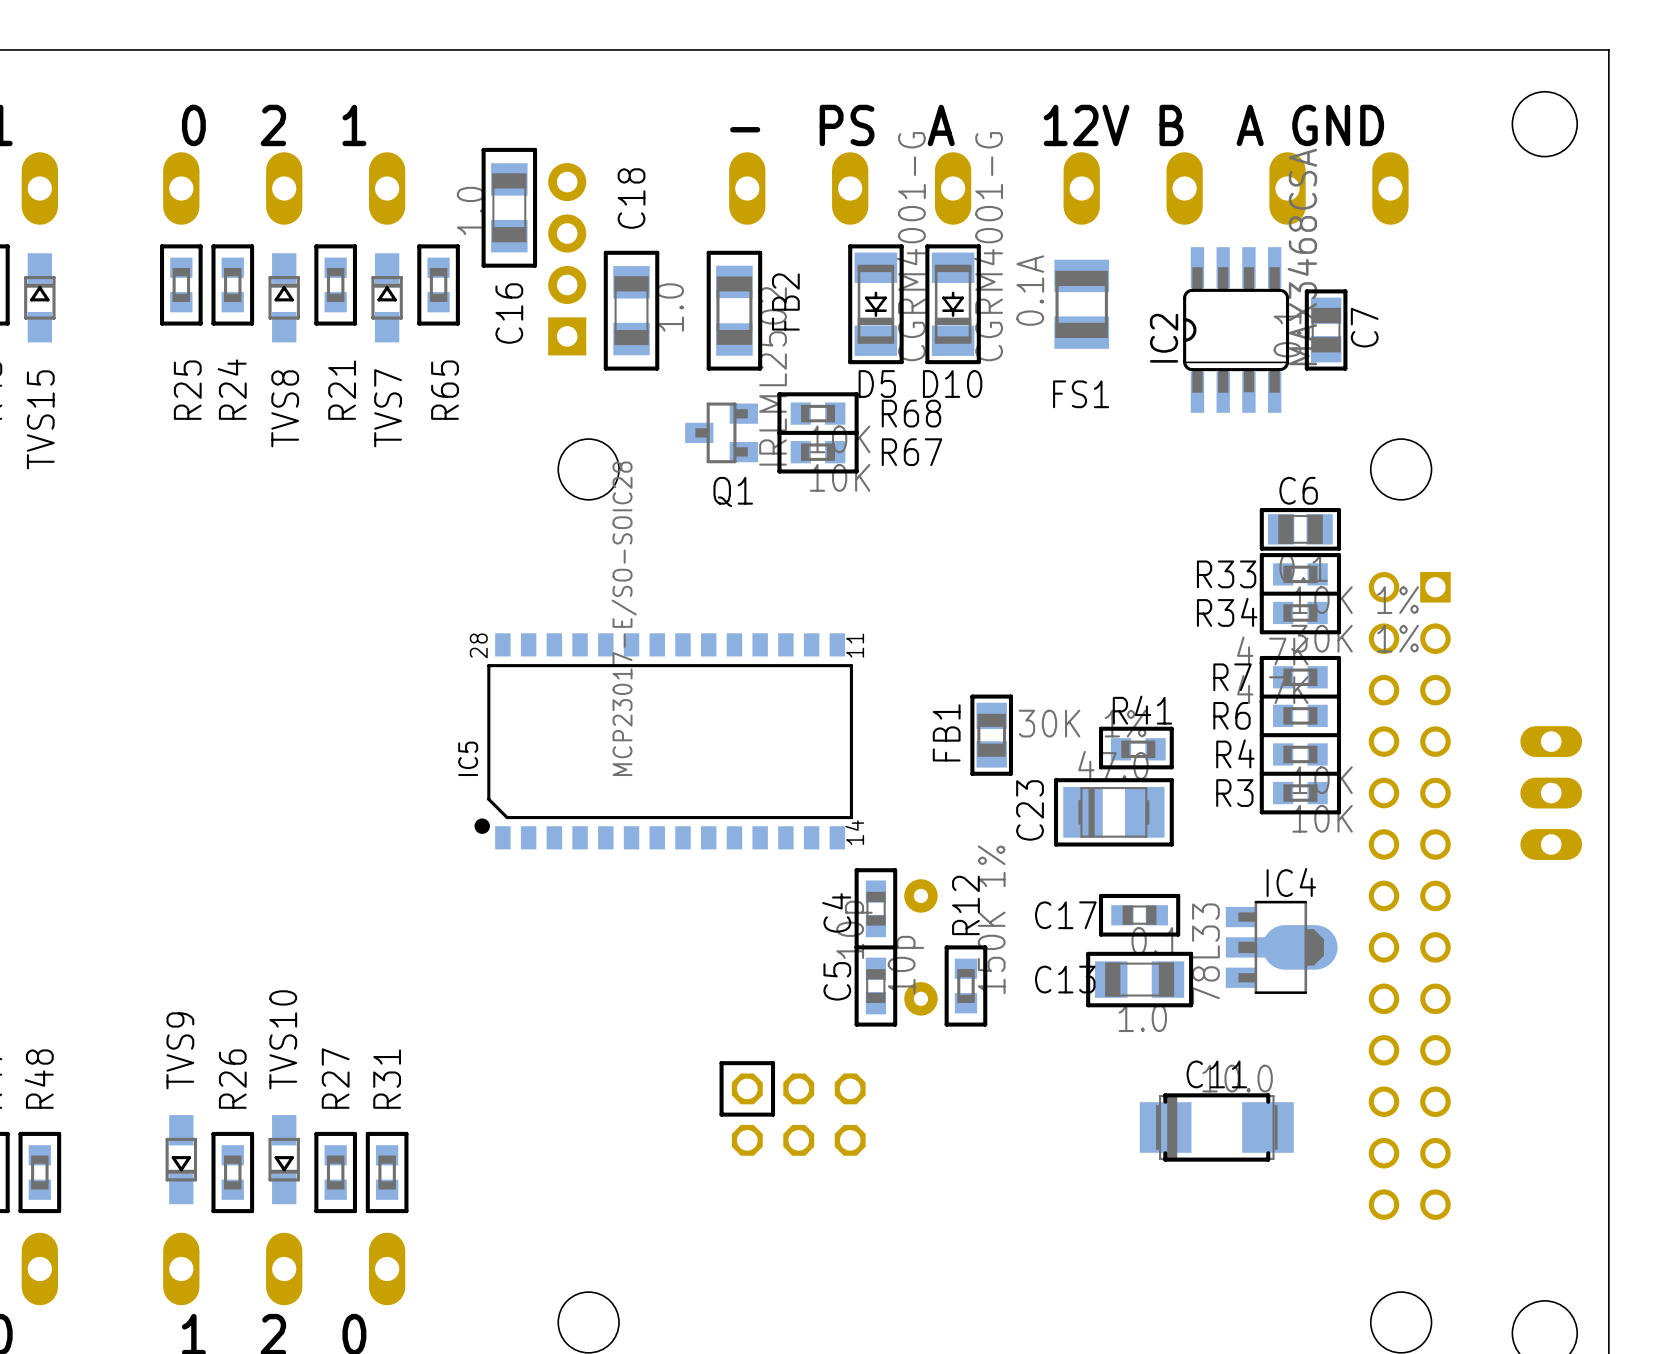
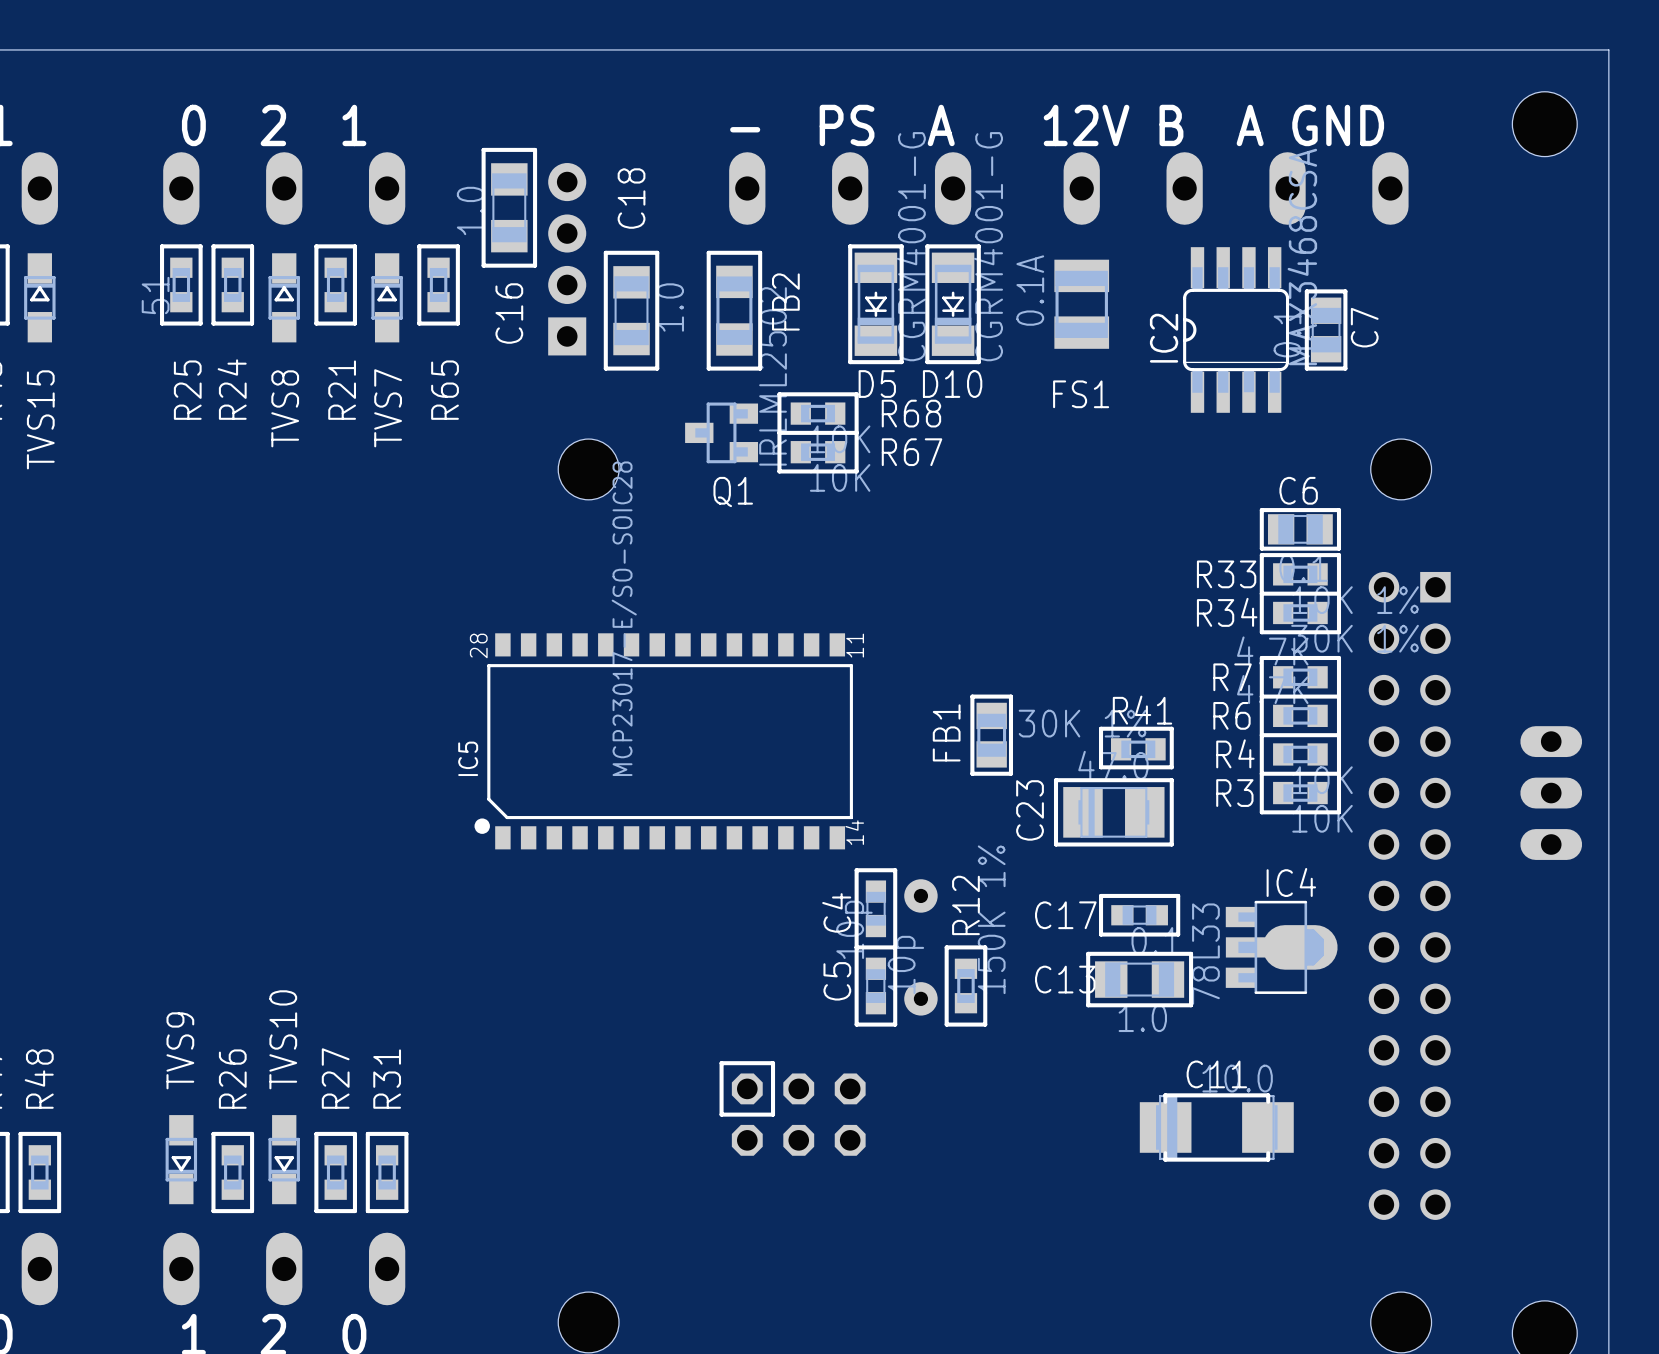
R25 value: none -> 51 (155, 295)

